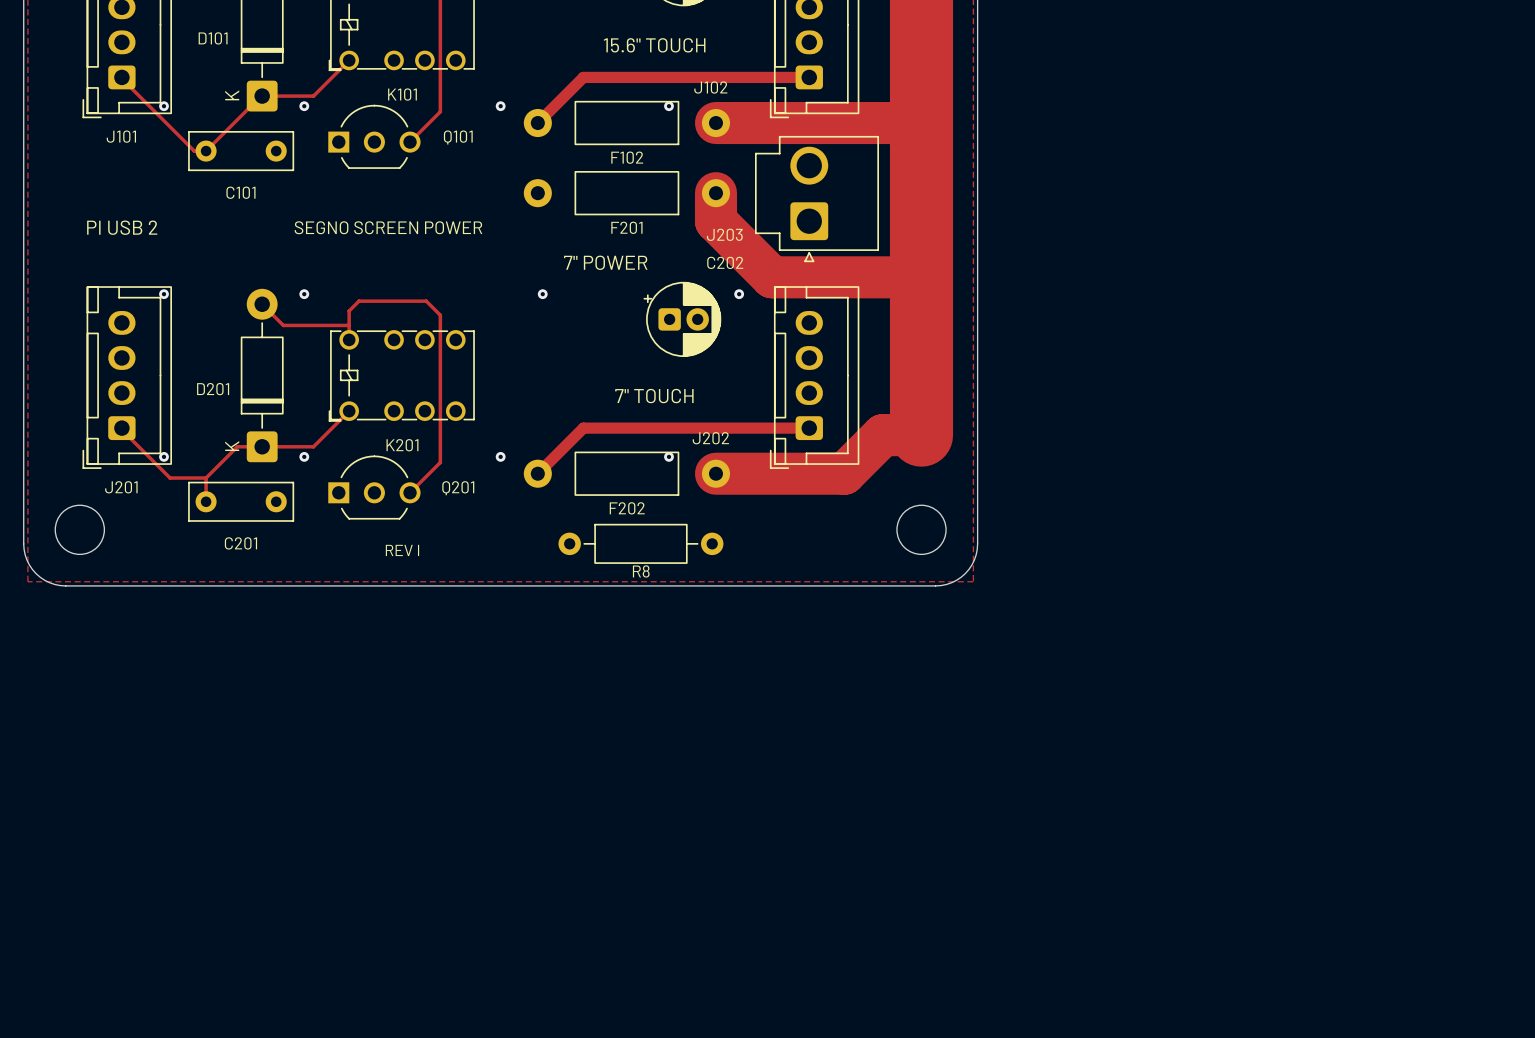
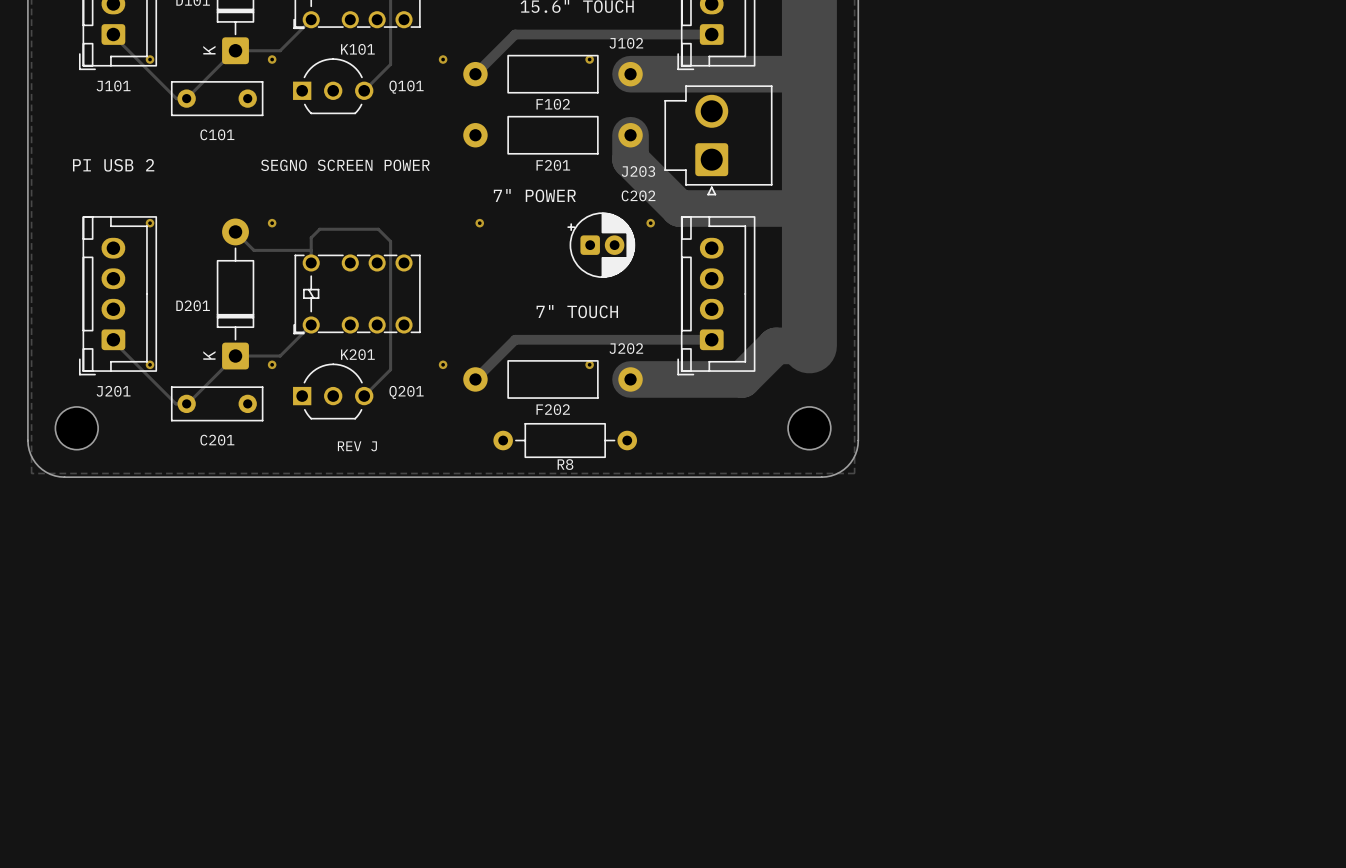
track: (262, 446) (237, 446) (206, 478) -> (235, 356) (187, 403) (175, 403) (155, 383)
track: (170, 478) (206, 478) -> none
track: (206, 478) (206, 501) -> none
text: REV I (402, 550) -> REV J (357, 446)

